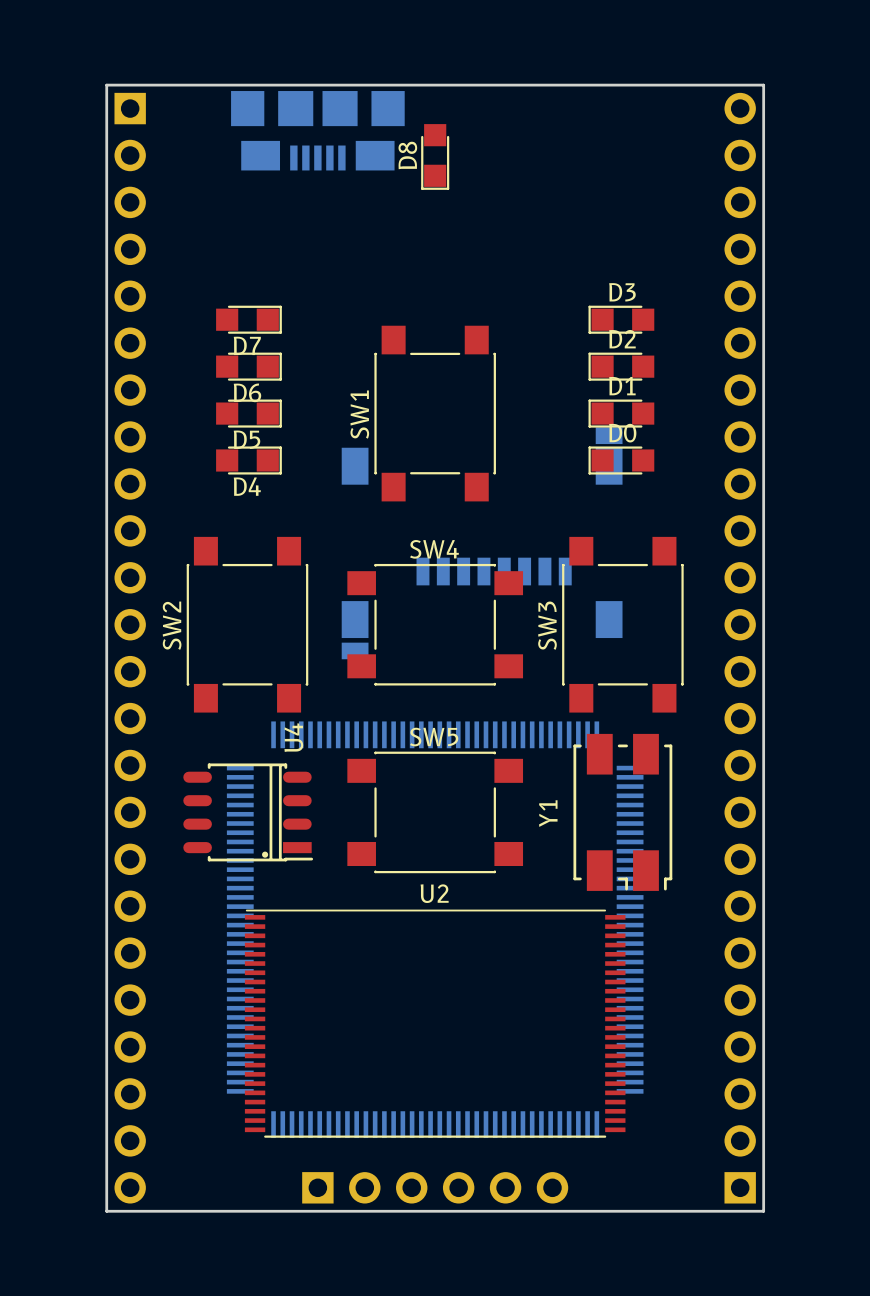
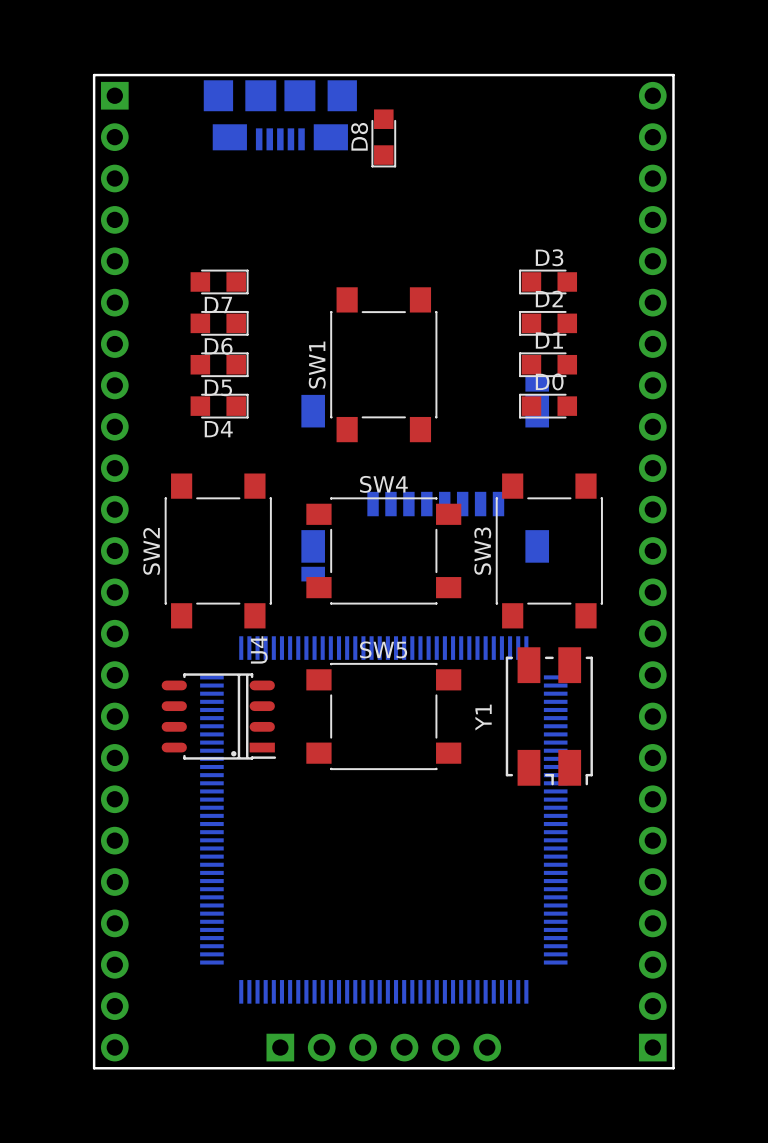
U2: (435, 1023) -> none

